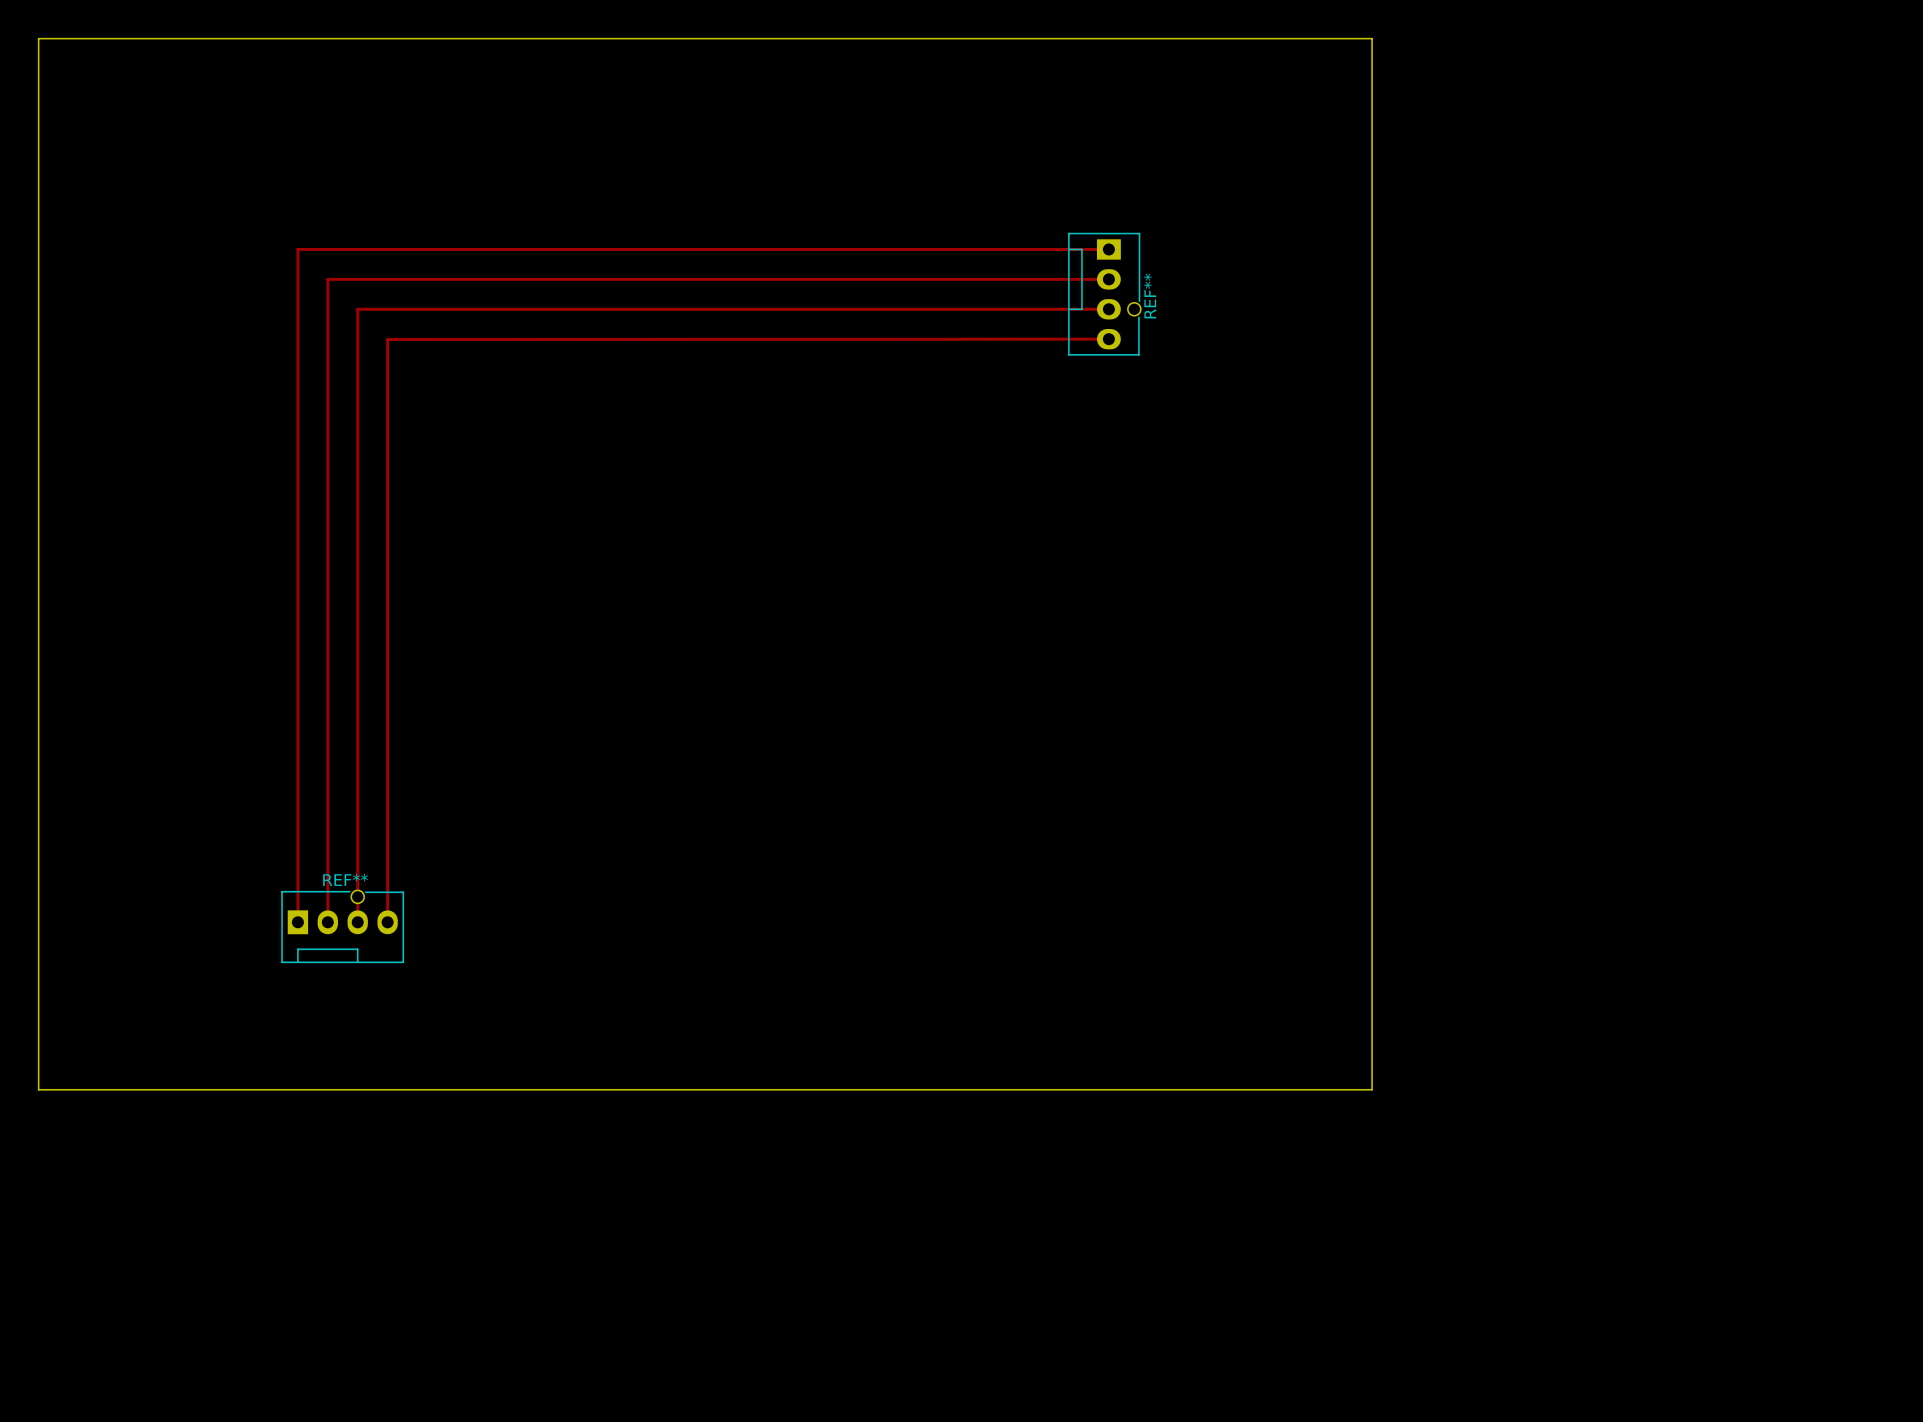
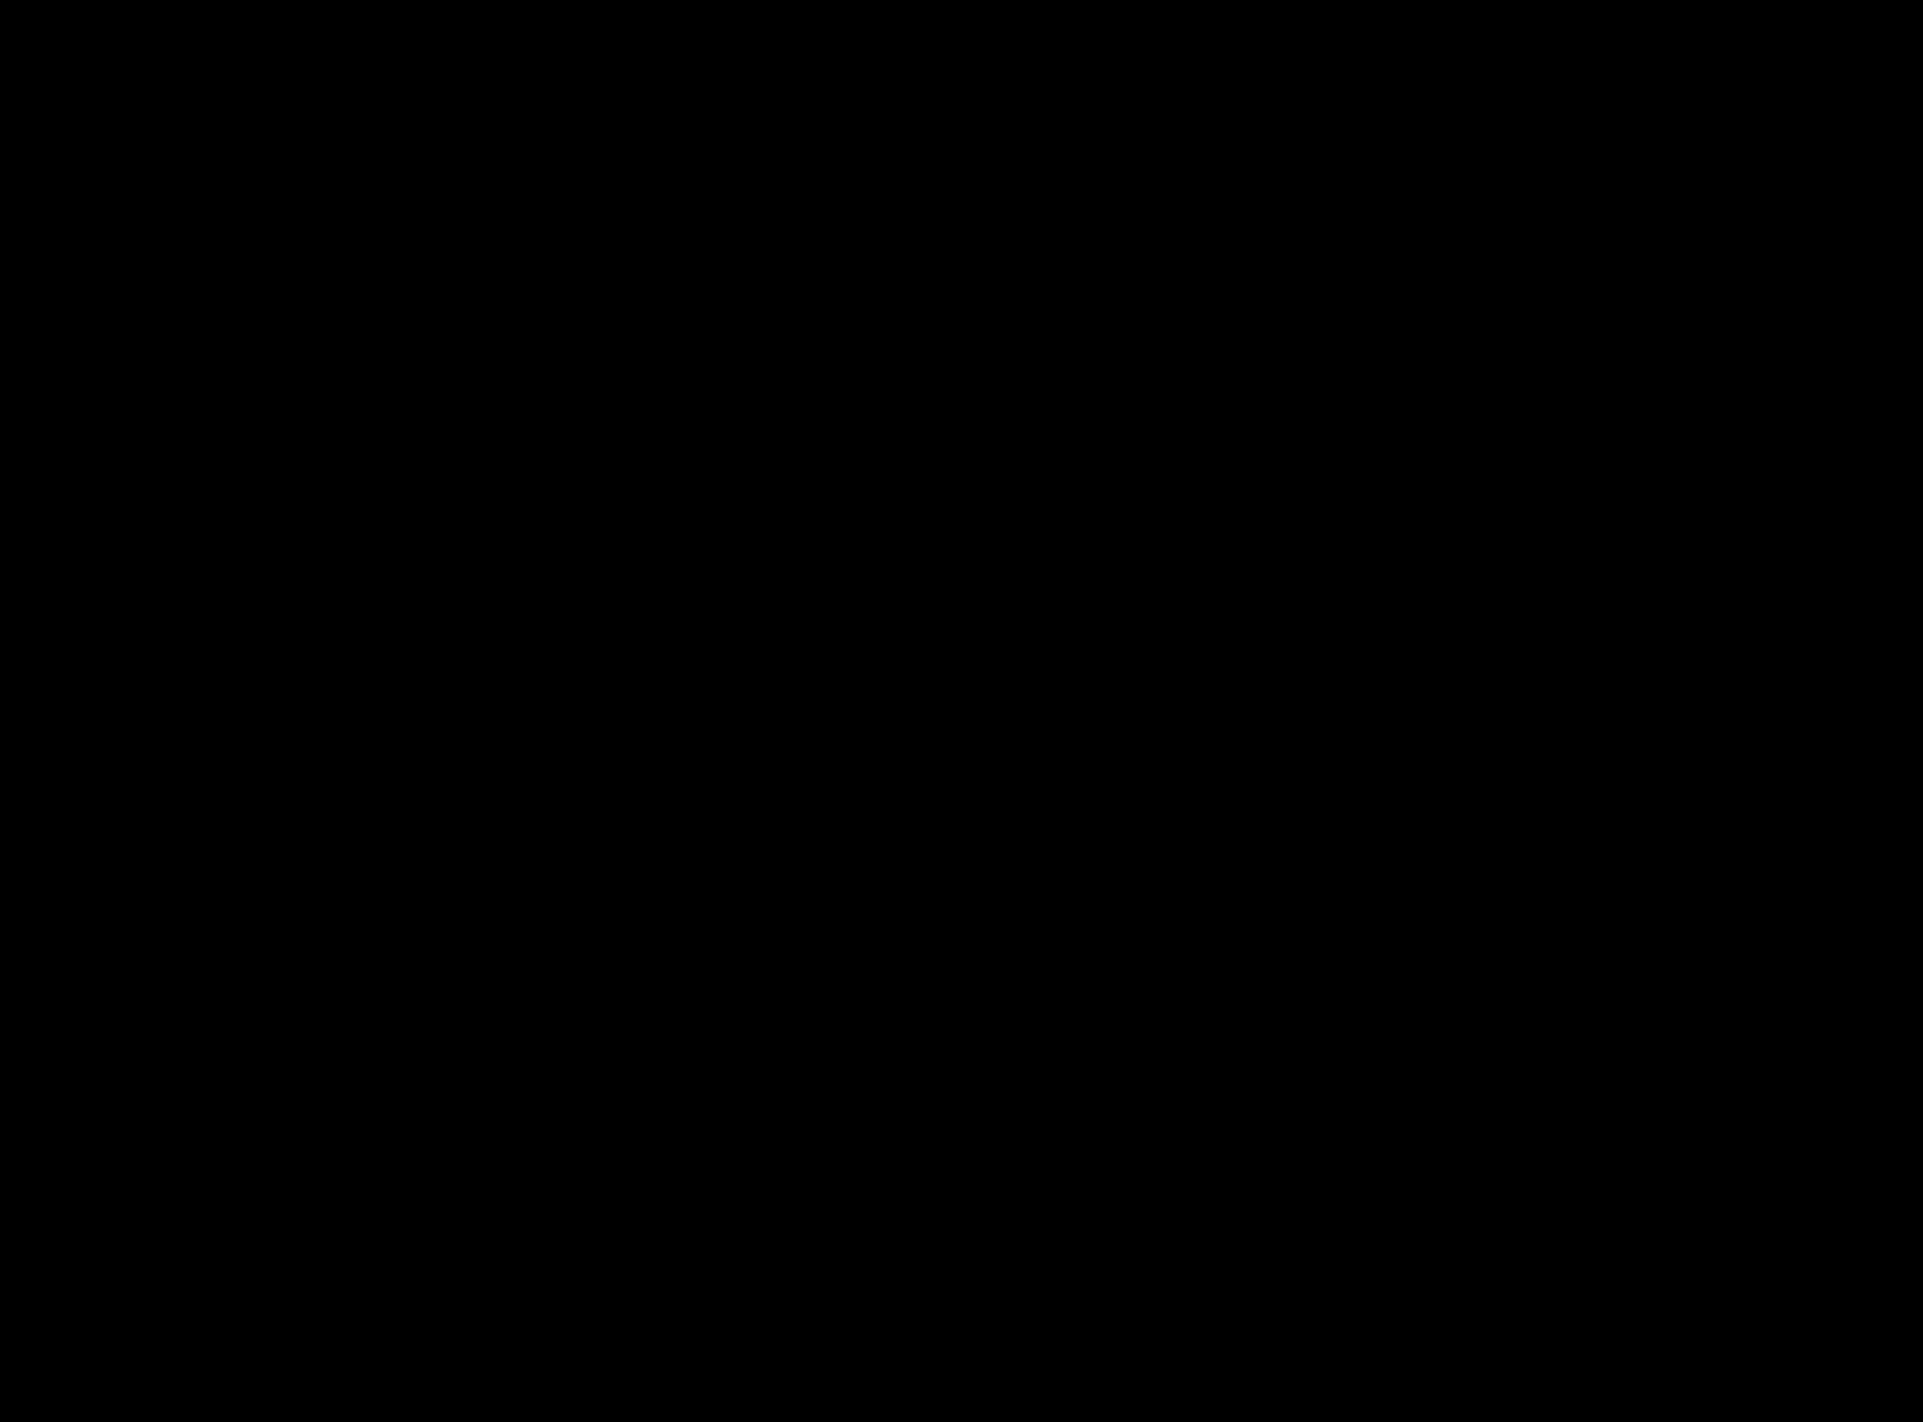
board edge: (38, 38) (1372, 38) (1372, 1089) (38, 1089) (38, 38) -> none
top track: (1108, 249) (297, 249) (297, 922) -> none
top track: (1108, 279) (327, 279) (327, 922) (326, 920) -> none
REF**: (1104, 294) -> none
top track: (1108, 309) (357, 309) (357, 922) -> none
top track: (1108, 339) (387, 339) (387, 922) -> none
REF**: (342, 926) -> none

